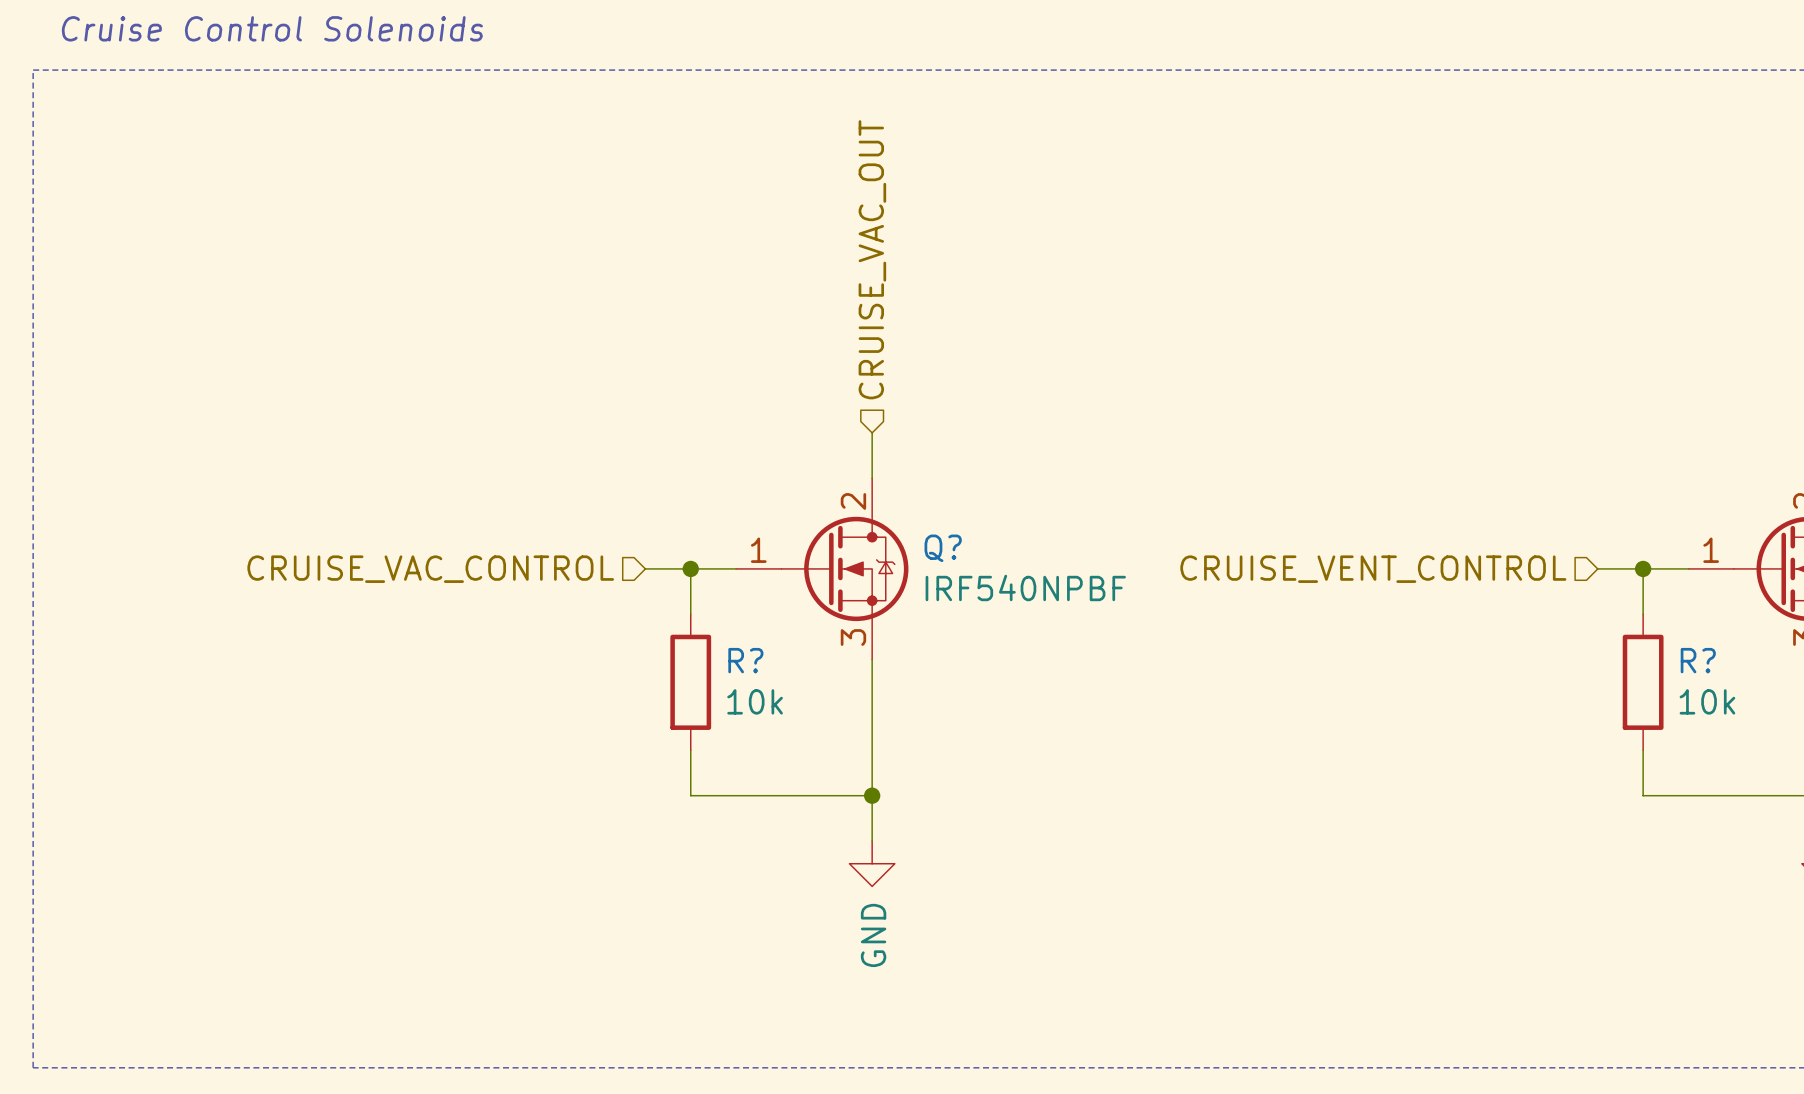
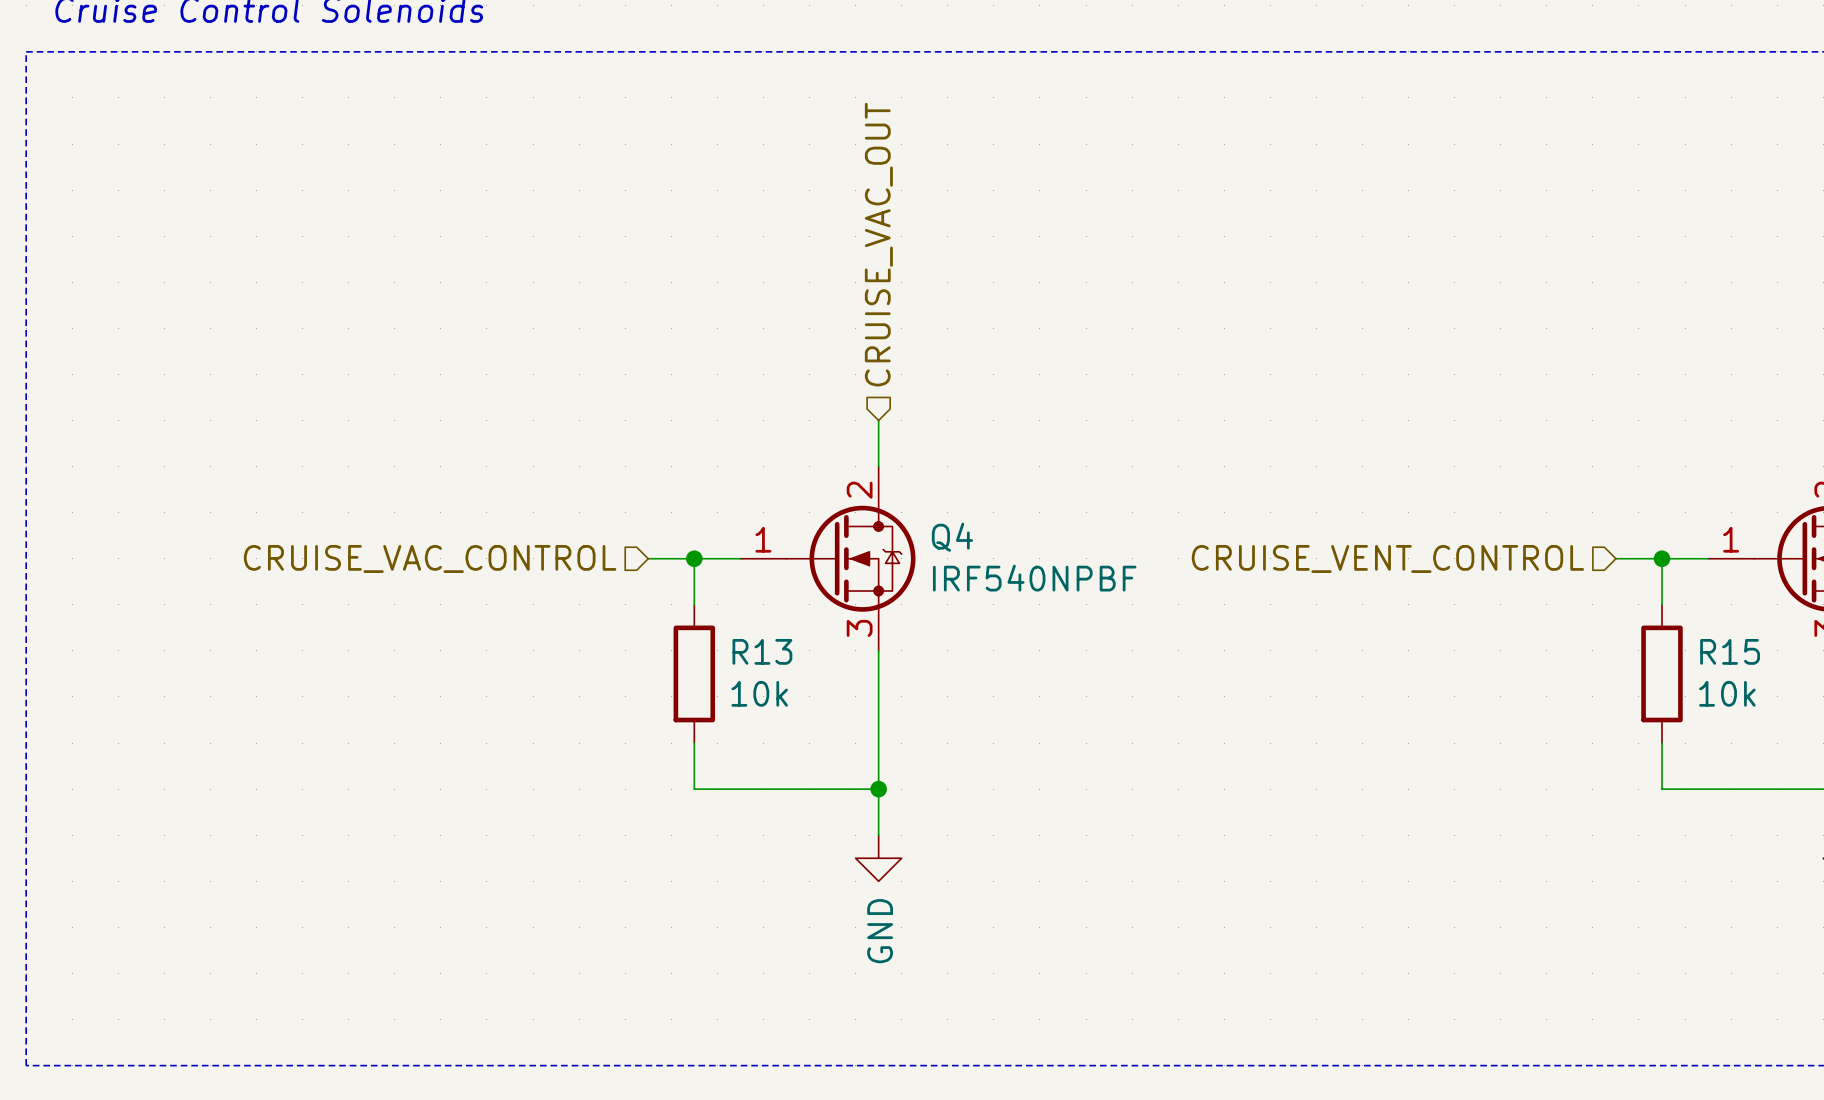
Q? name: Q? (943, 548) -> Q4 (952, 537)
R? name: R? (745, 660) -> R13 (762, 651)
R? name: R? (1698, 660) -> R15 (1730, 651)

